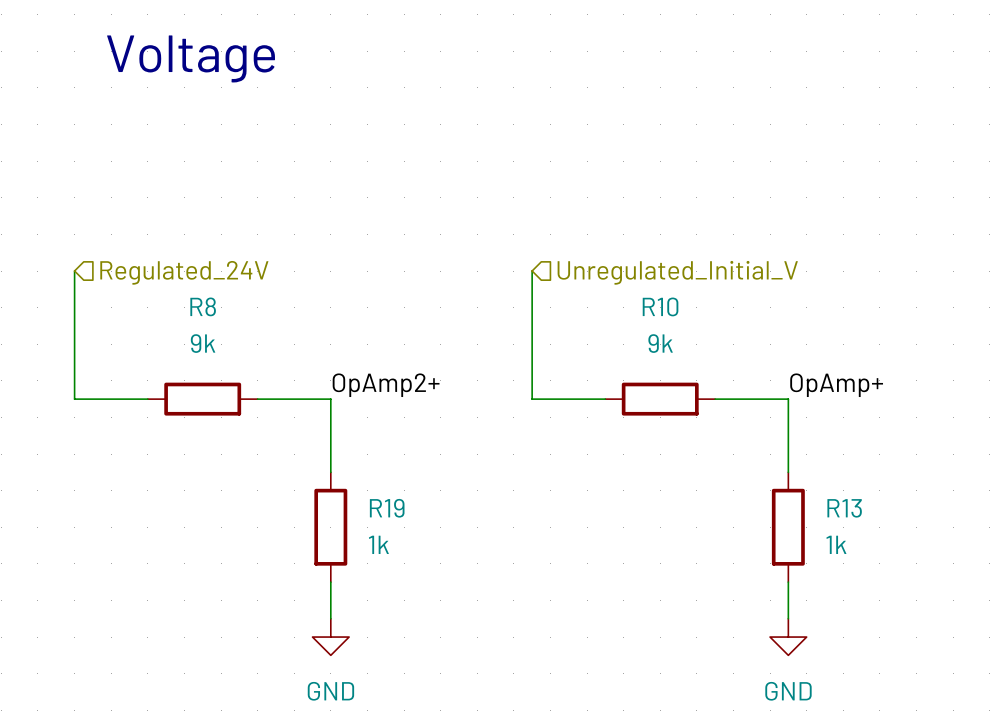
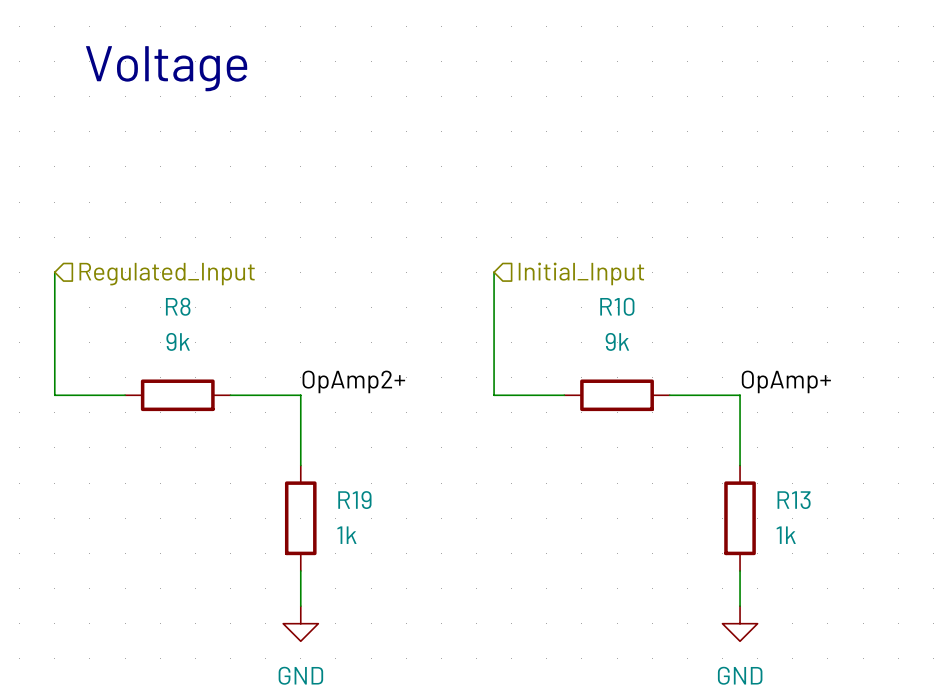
hierarchical label: Regulated_24V (184, 272) -> Regulated_Input (167, 274)
hierarchical label: Unregulated_Initial_V (677, 272) -> Initial_Input (581, 273)

